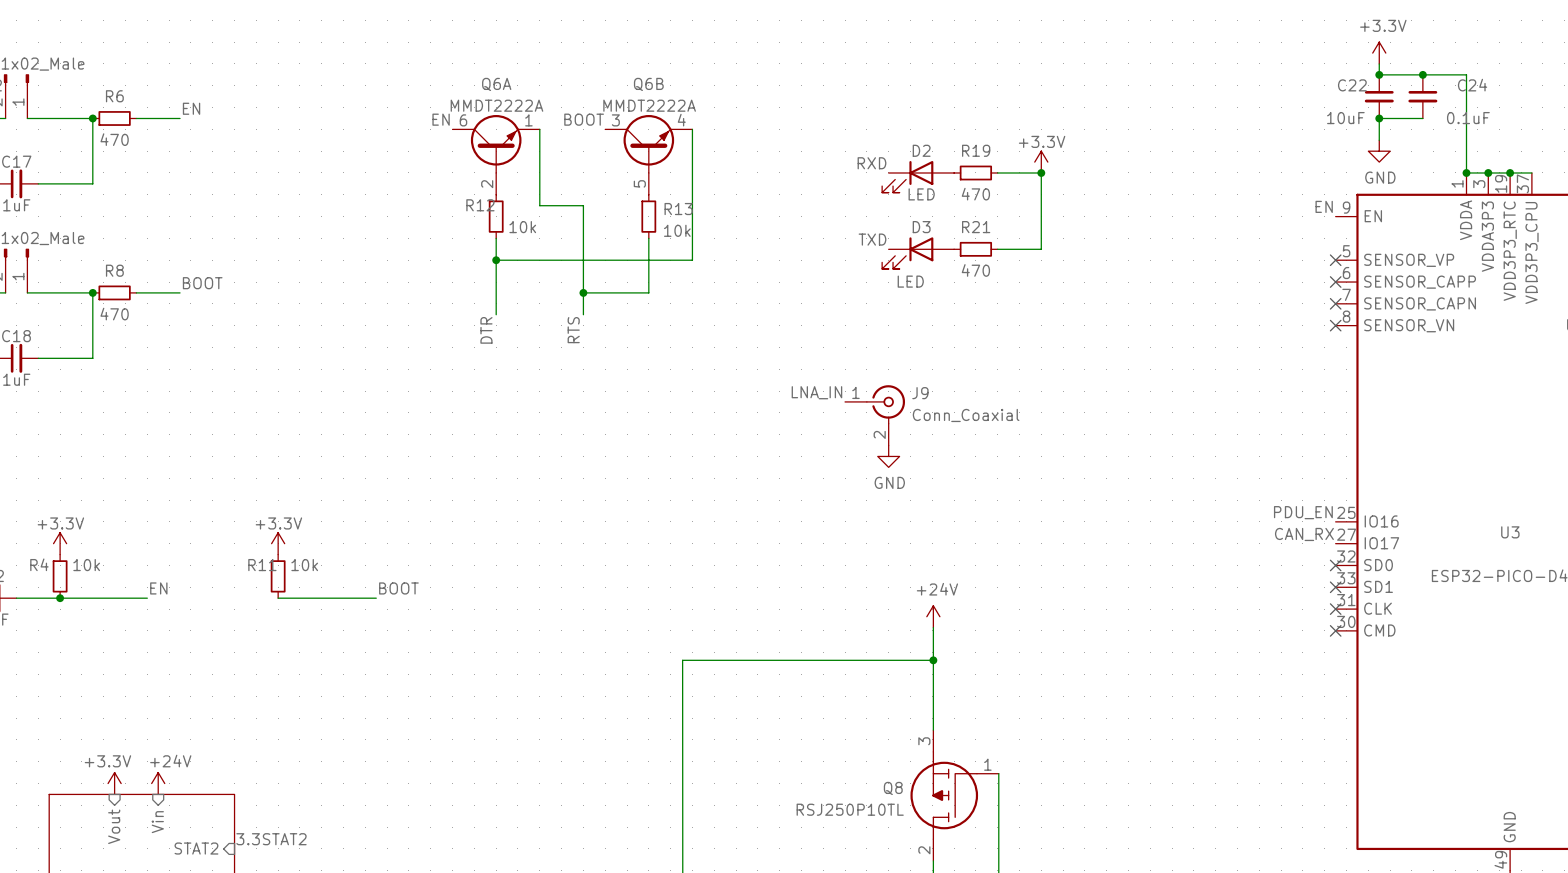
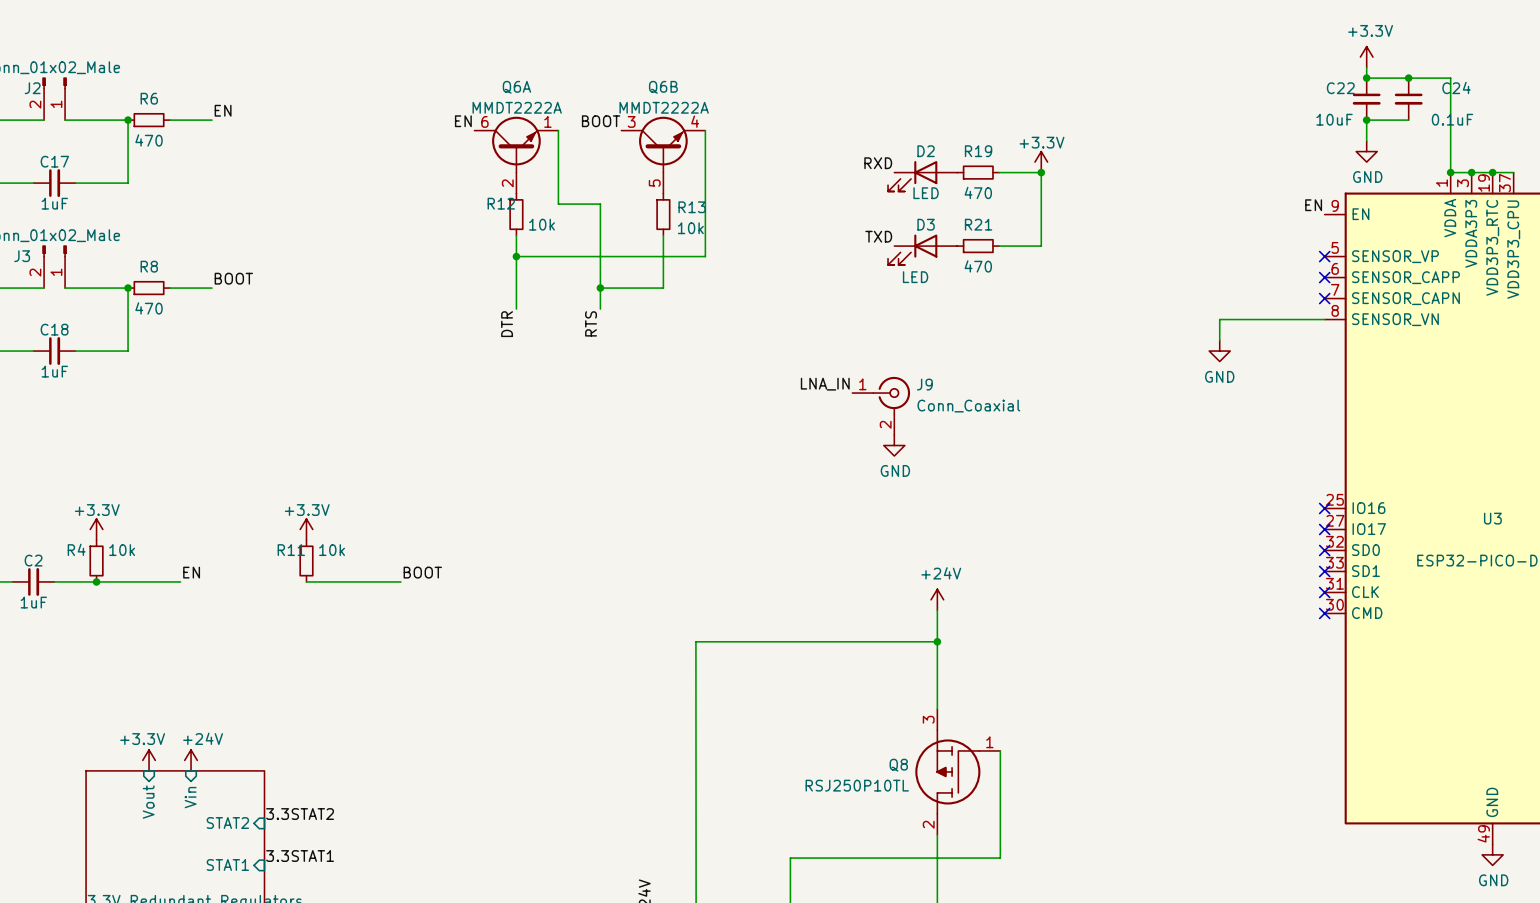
wire: none -> (1324, 319) (1219, 319) (1219, 340)
no-connect mark: (1335, 325) -> none
power symbol: none -> GND (1219, 351)
label: PDU_EN (1303, 512) -> none
no-connect mark: none -> (1324, 508)
label: CAN_RX (1304, 534) -> none
no-connect mark: none -> (1324, 529)

